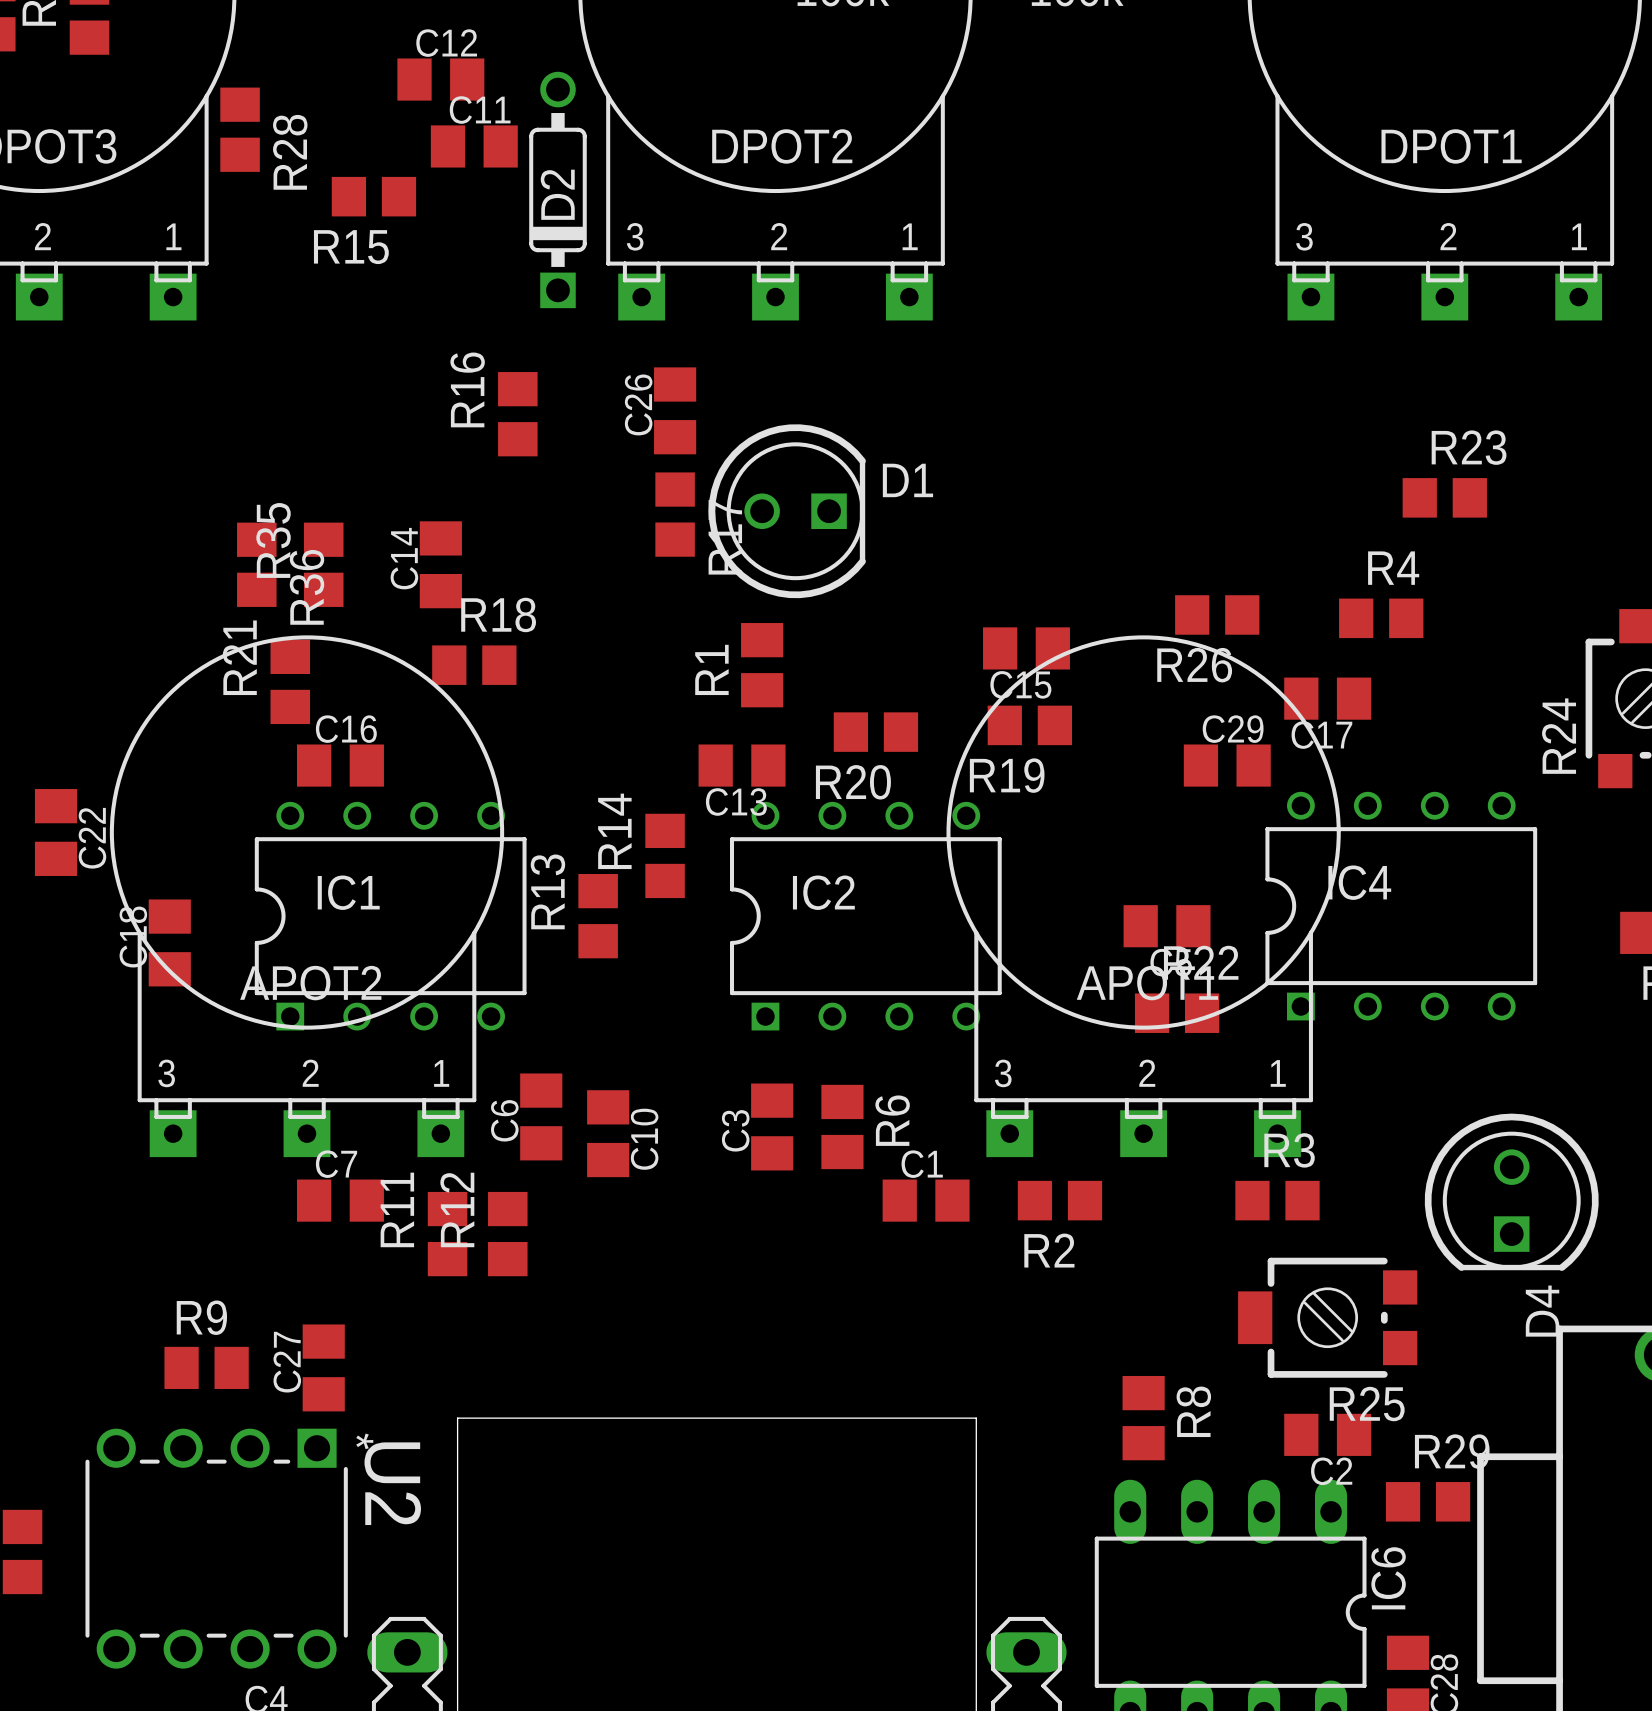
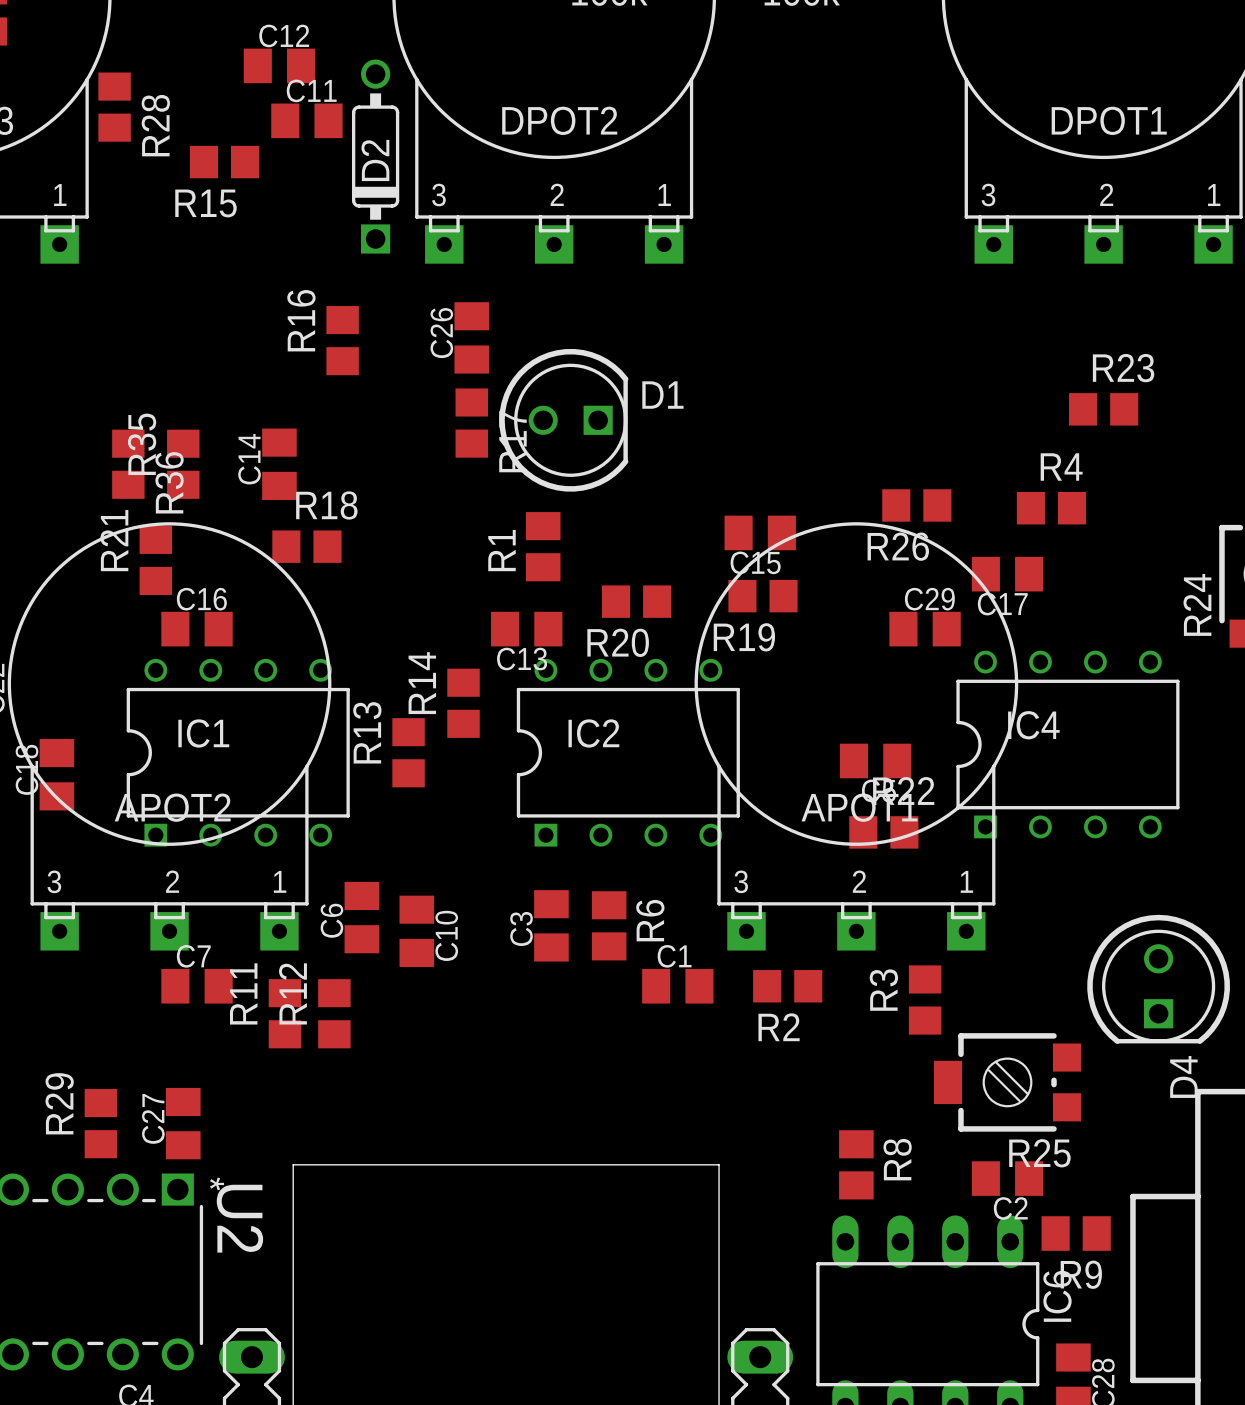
R3 name position: R3 (1289, 1150) -> R3 (883, 990)
R3 rotation: 0° (1277, 1200) -> 90° clockwise (925, 1000)
R3 position: (1277, 1200) -> (925, 1000)
R9 name position: R9 (201, 1317) -> R9 (1081, 1274)
R9 position: (206, 1367) -> (1076, 1233)
R29 name position: R29 (1452, 1451) -> R29 (59, 1103)
R29 rotation: 0° (1428, 1501) -> 90° clockwise (100, 1123)
R29 position: (1428, 1501) -> (100, 1123)

